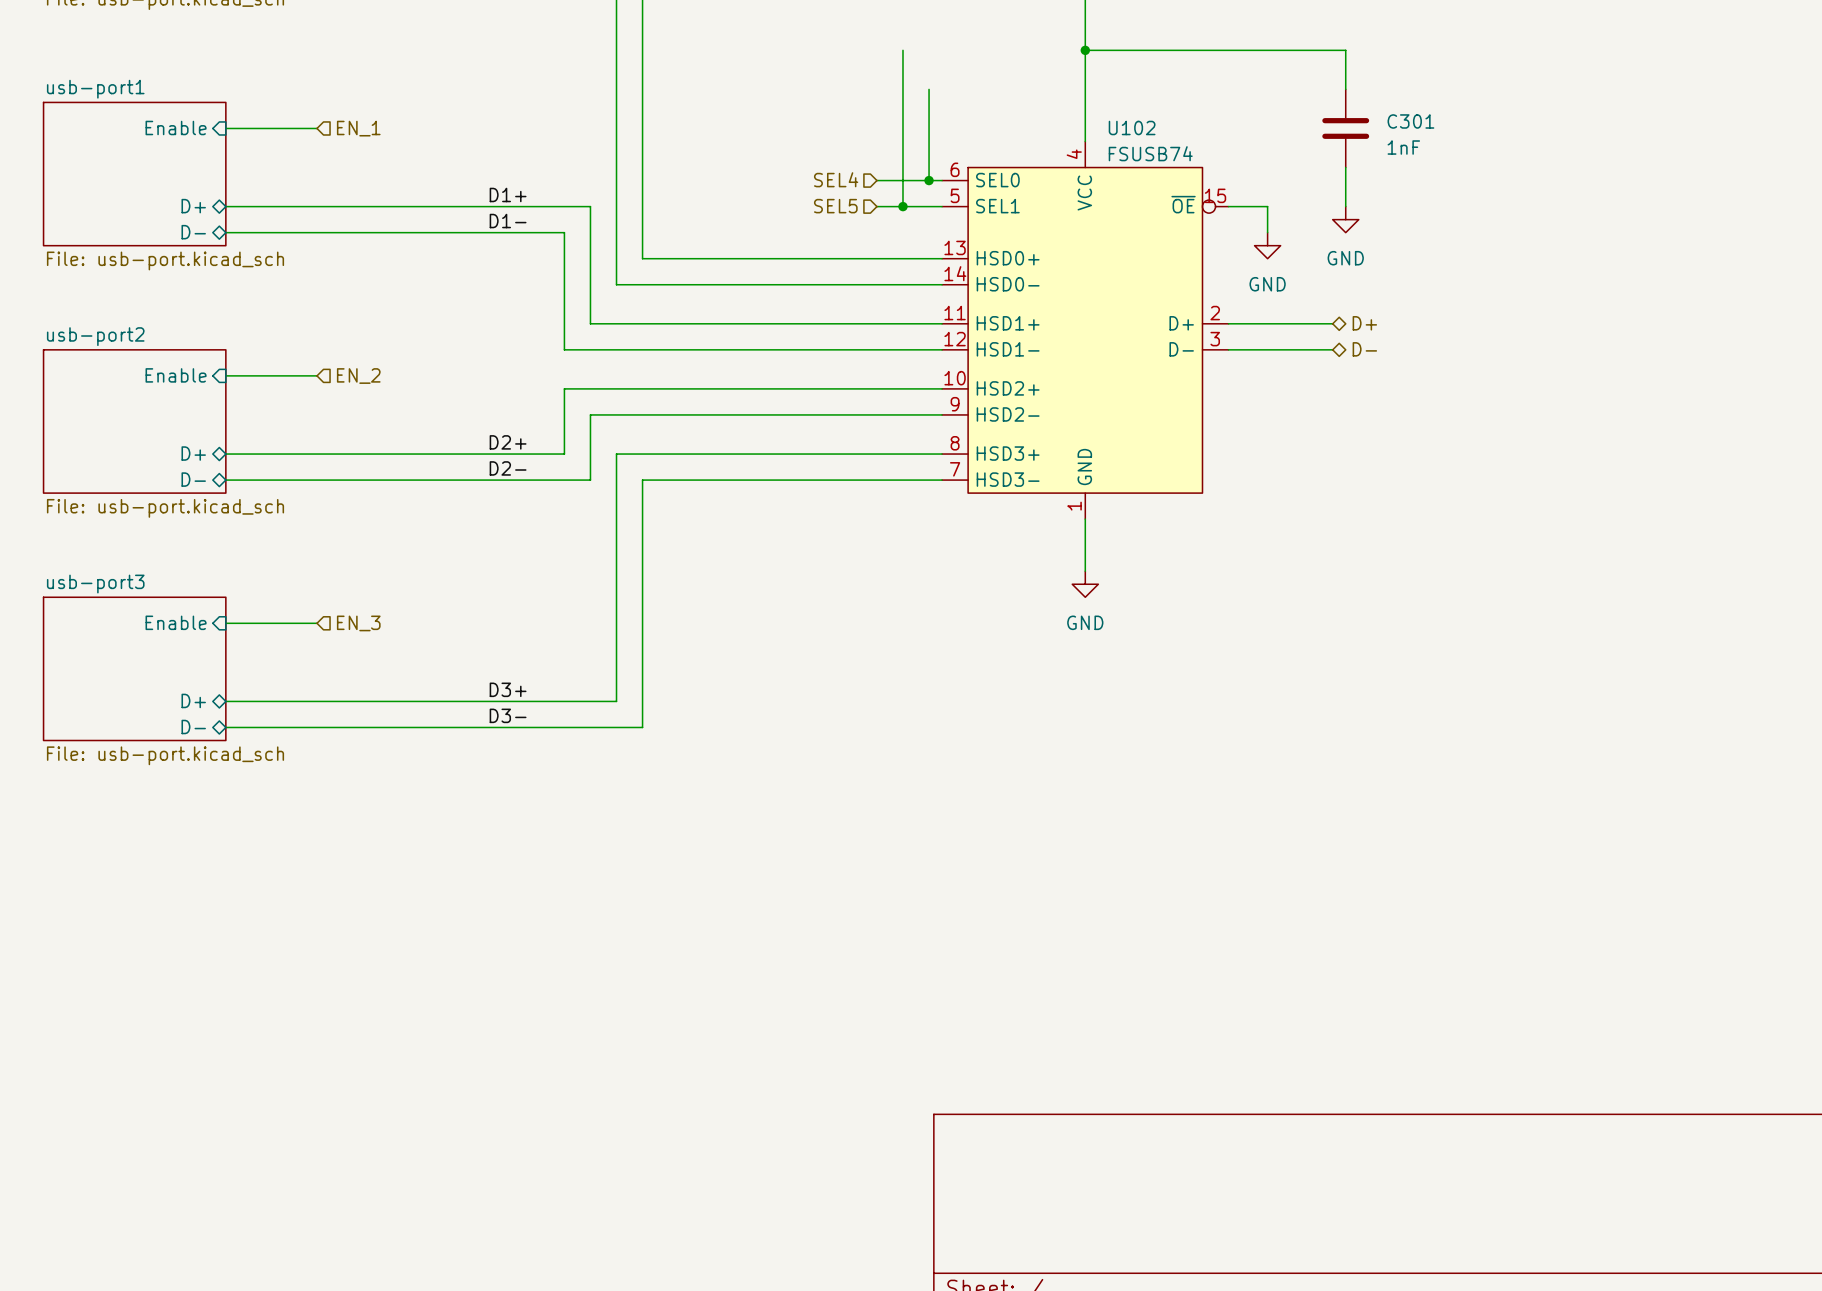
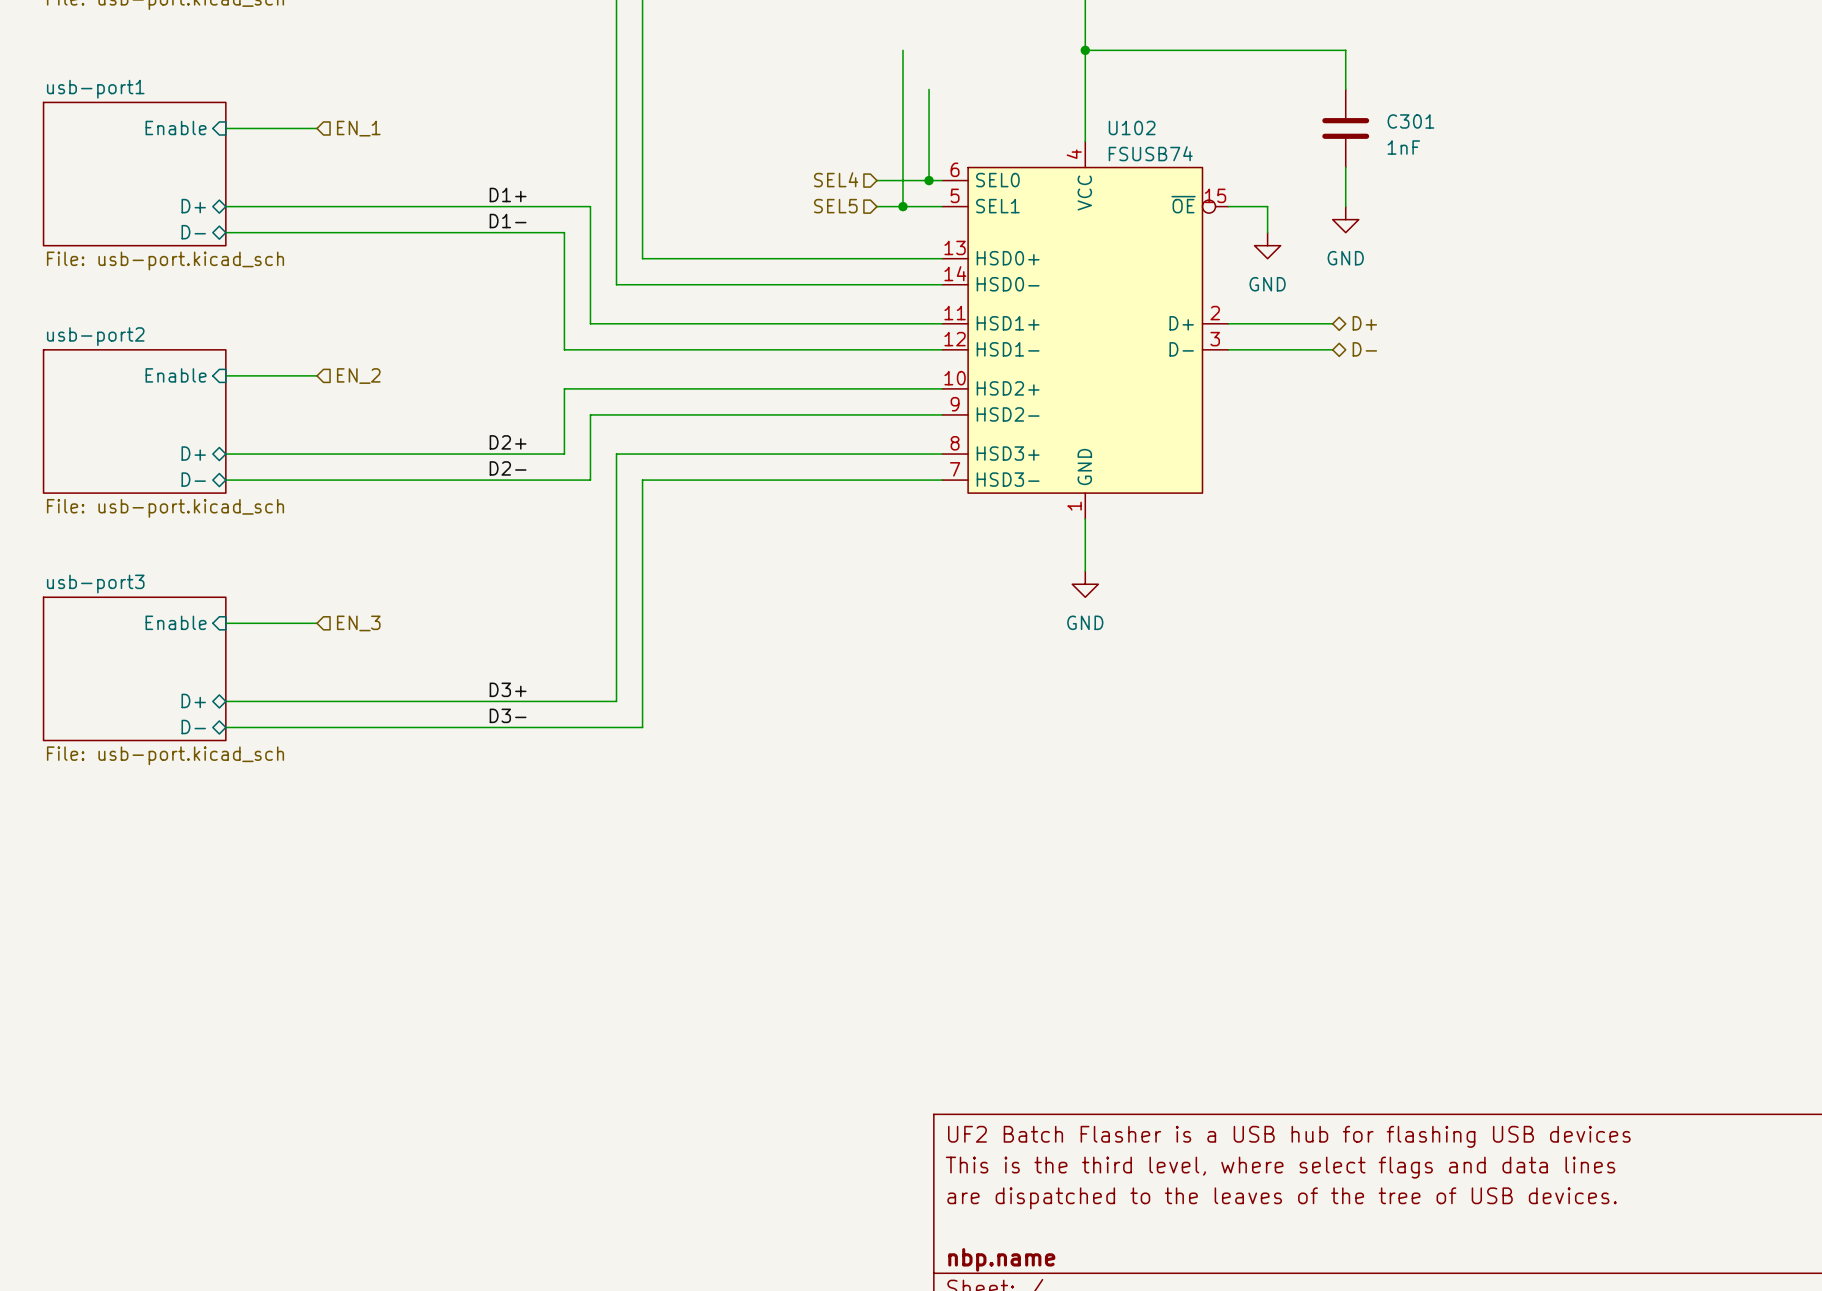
title block: none -> UF2 Batch Flasher is a USB hub for flashing USB devices (1289, 1136)
title block: none -> This is the third level, where select flags and data lines (1280, 1167)
title block: none -> are dispatched to the leaves of the tree of USB devices. (1282, 1198)
title block: none -> nbp.name (1001, 1259)

